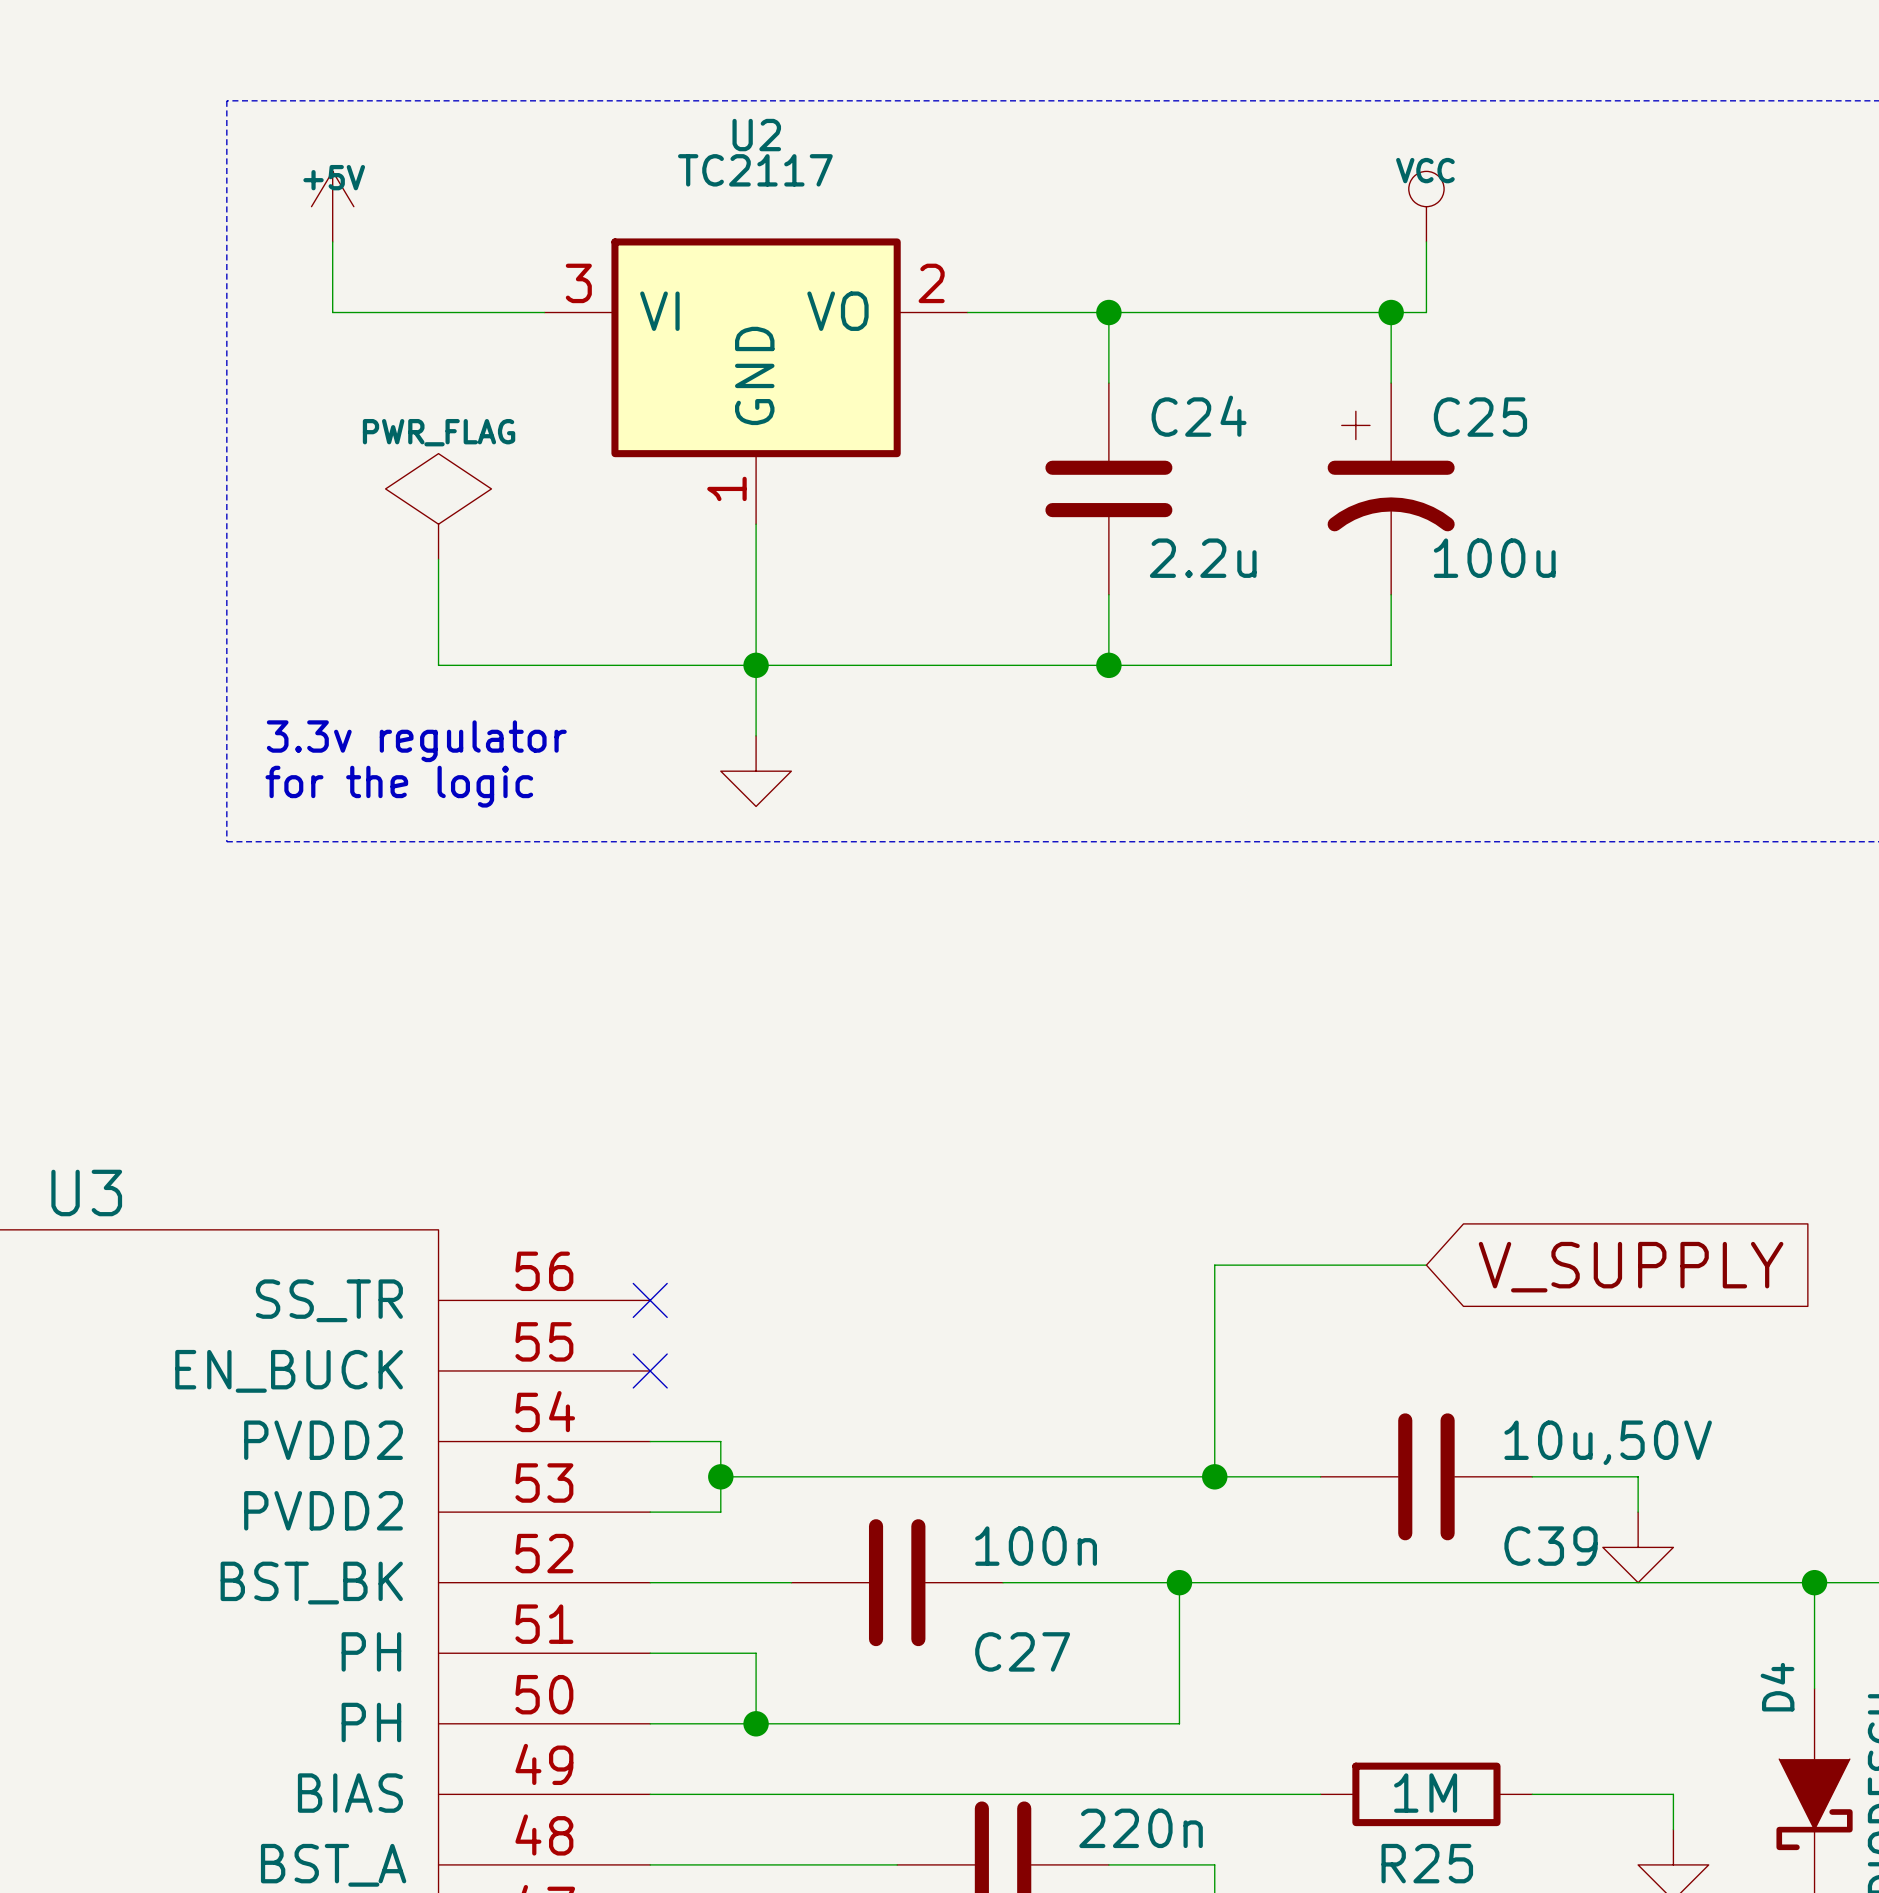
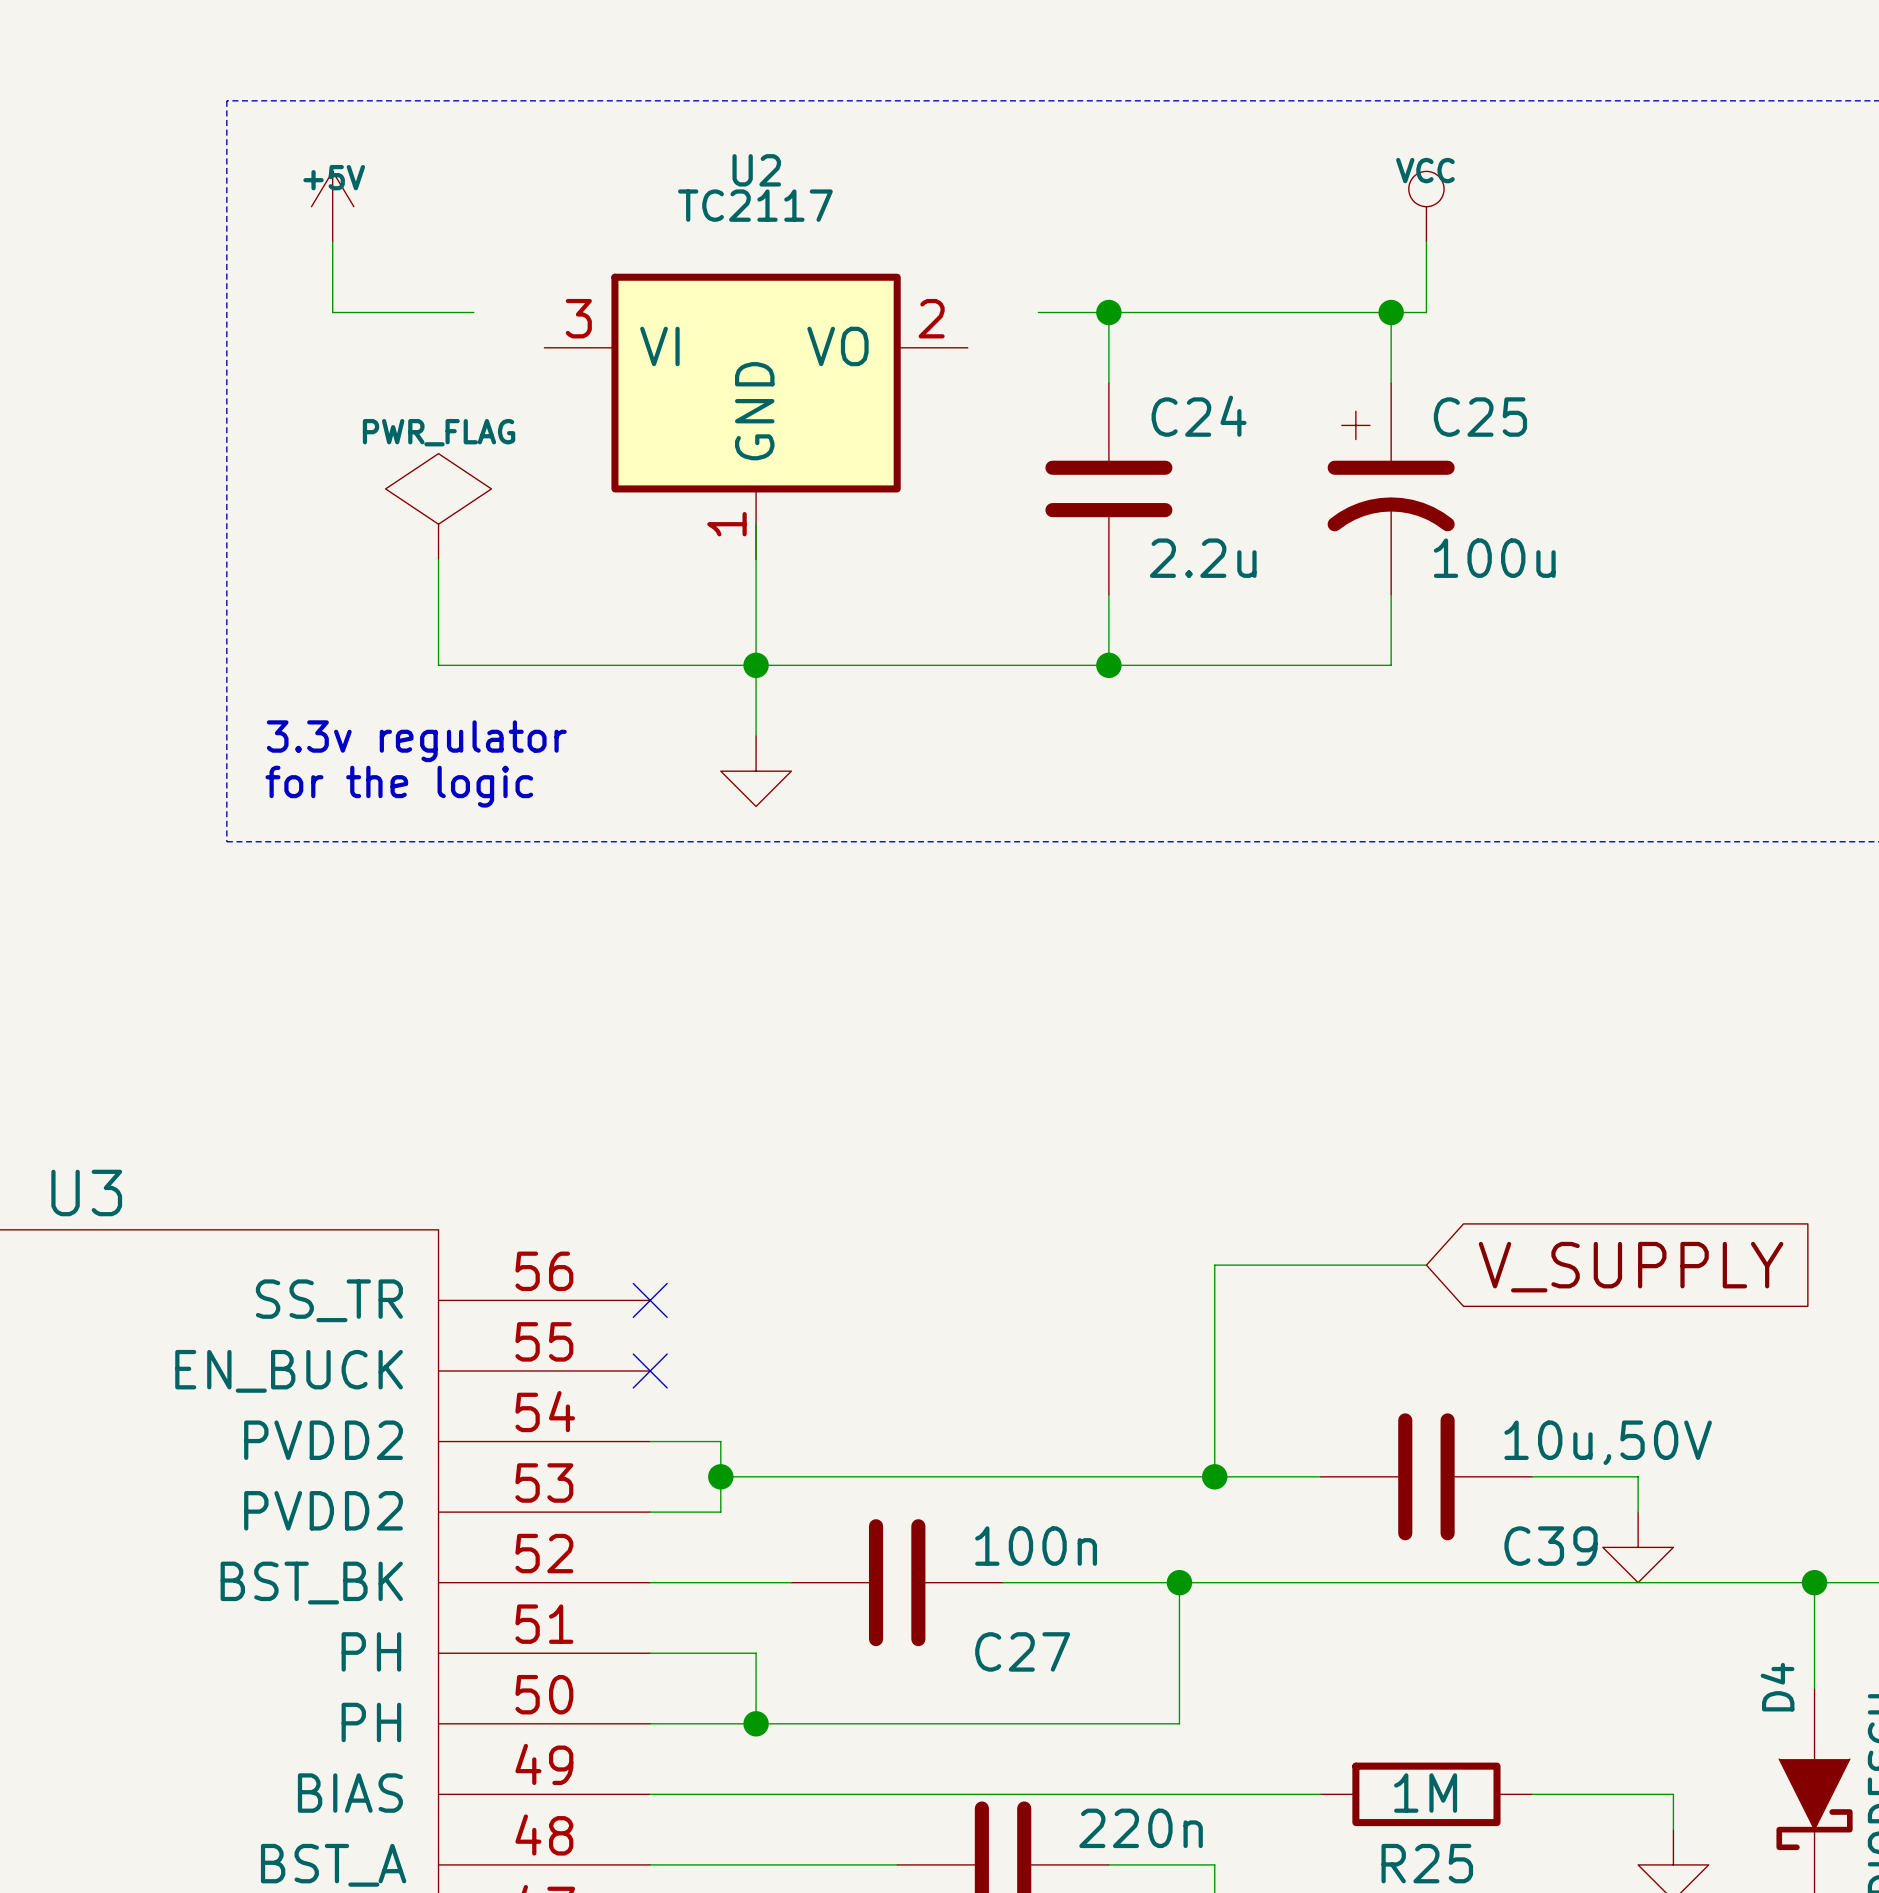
wire: (473, 312) (544, 312) -> none
wire: (967, 312) (1038, 312) -> none
U2 position: (756, 381) -> (756, 416)

